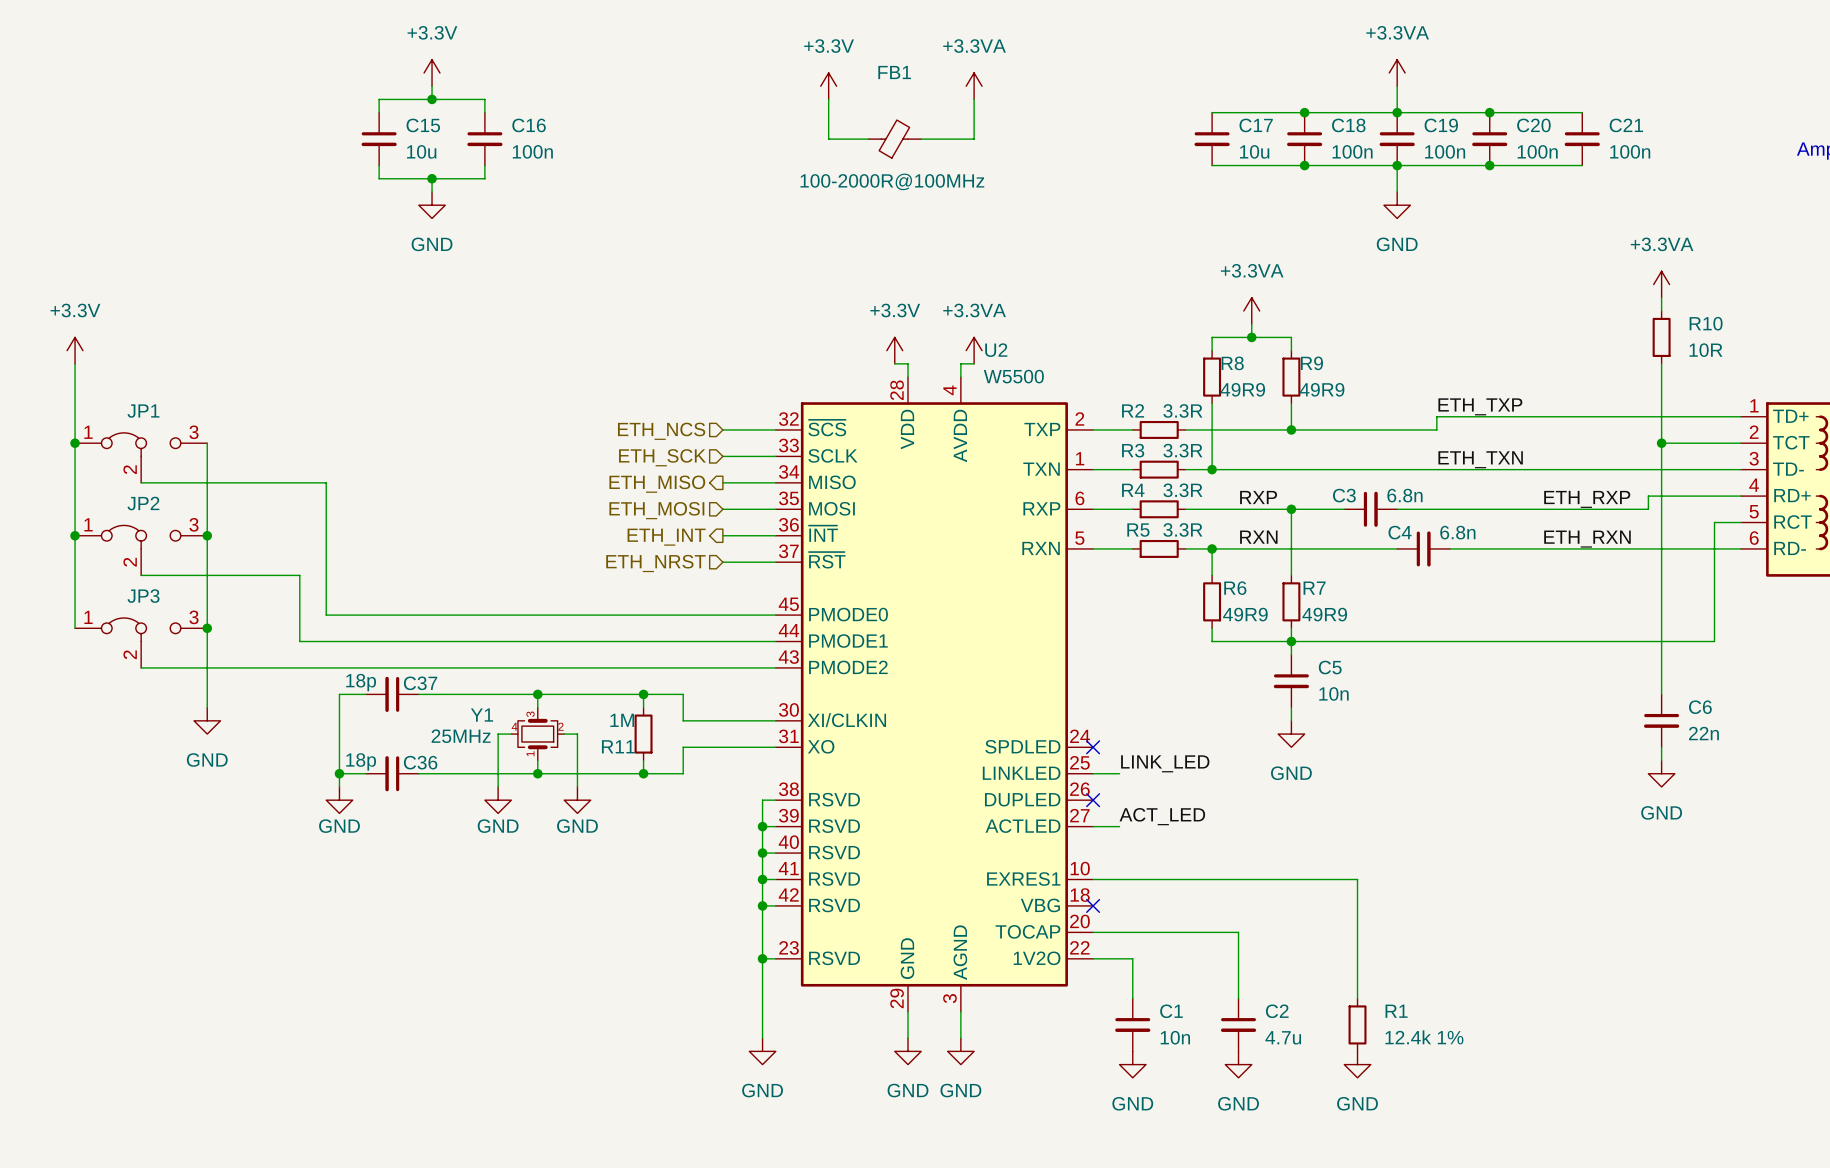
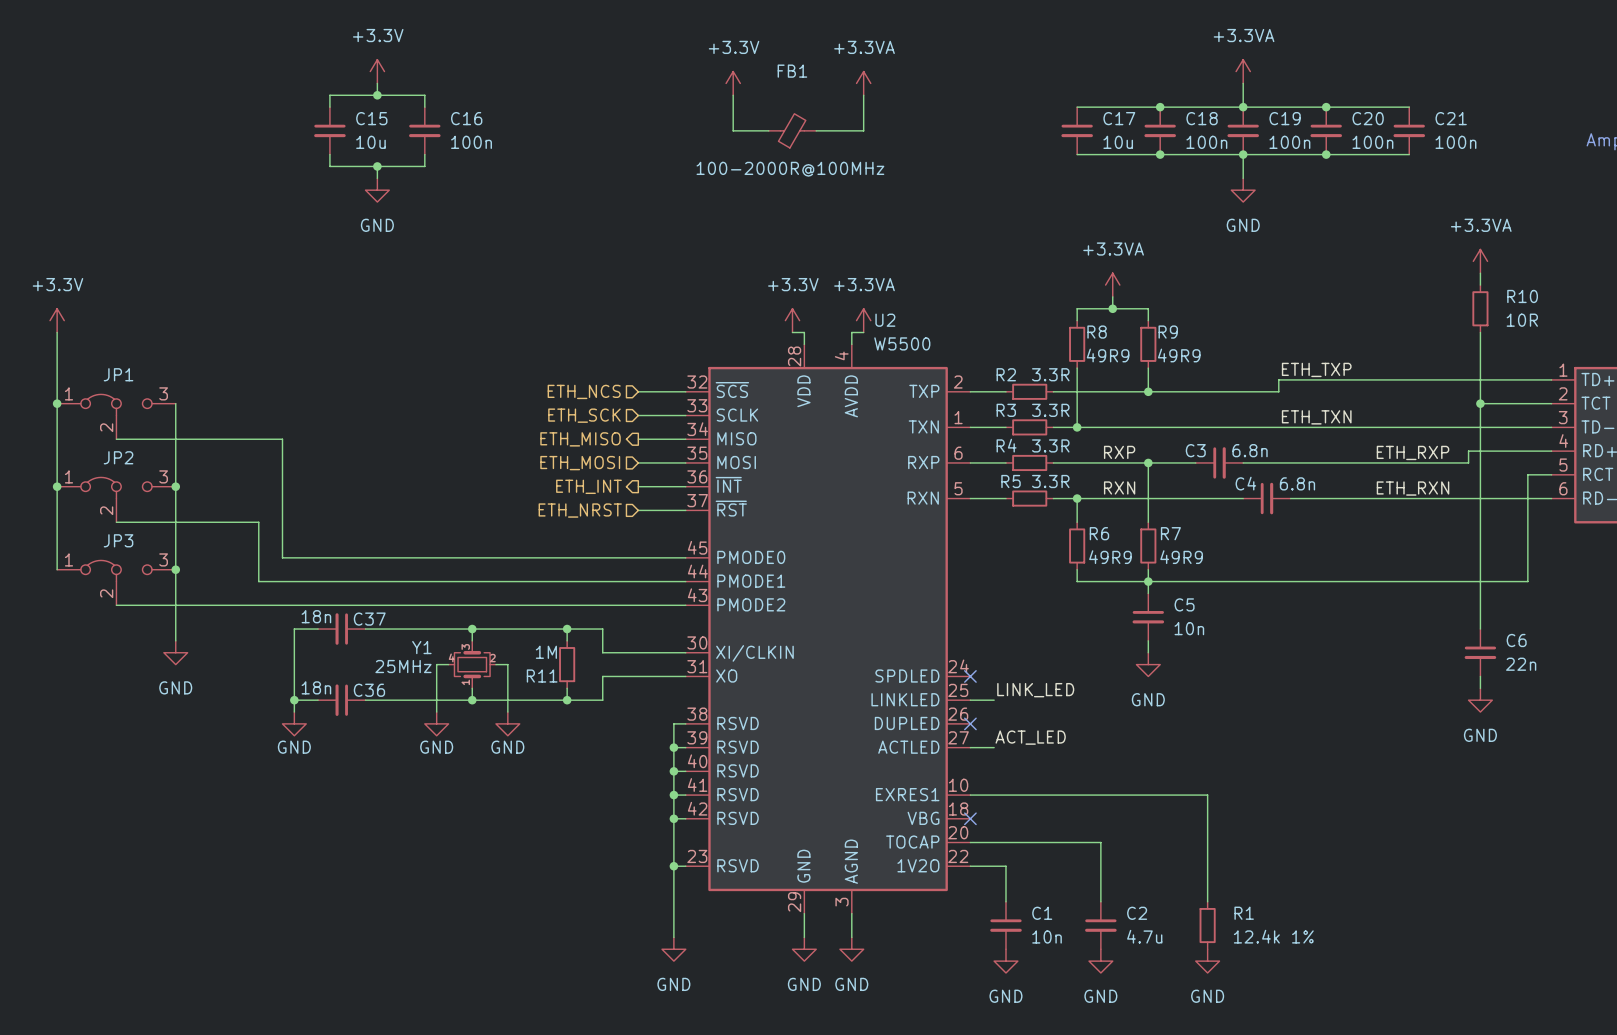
C37 value: 18p (361, 682) -> 18n (316, 616)
C36 value: 18p (361, 761) -> 18n (316, 687)

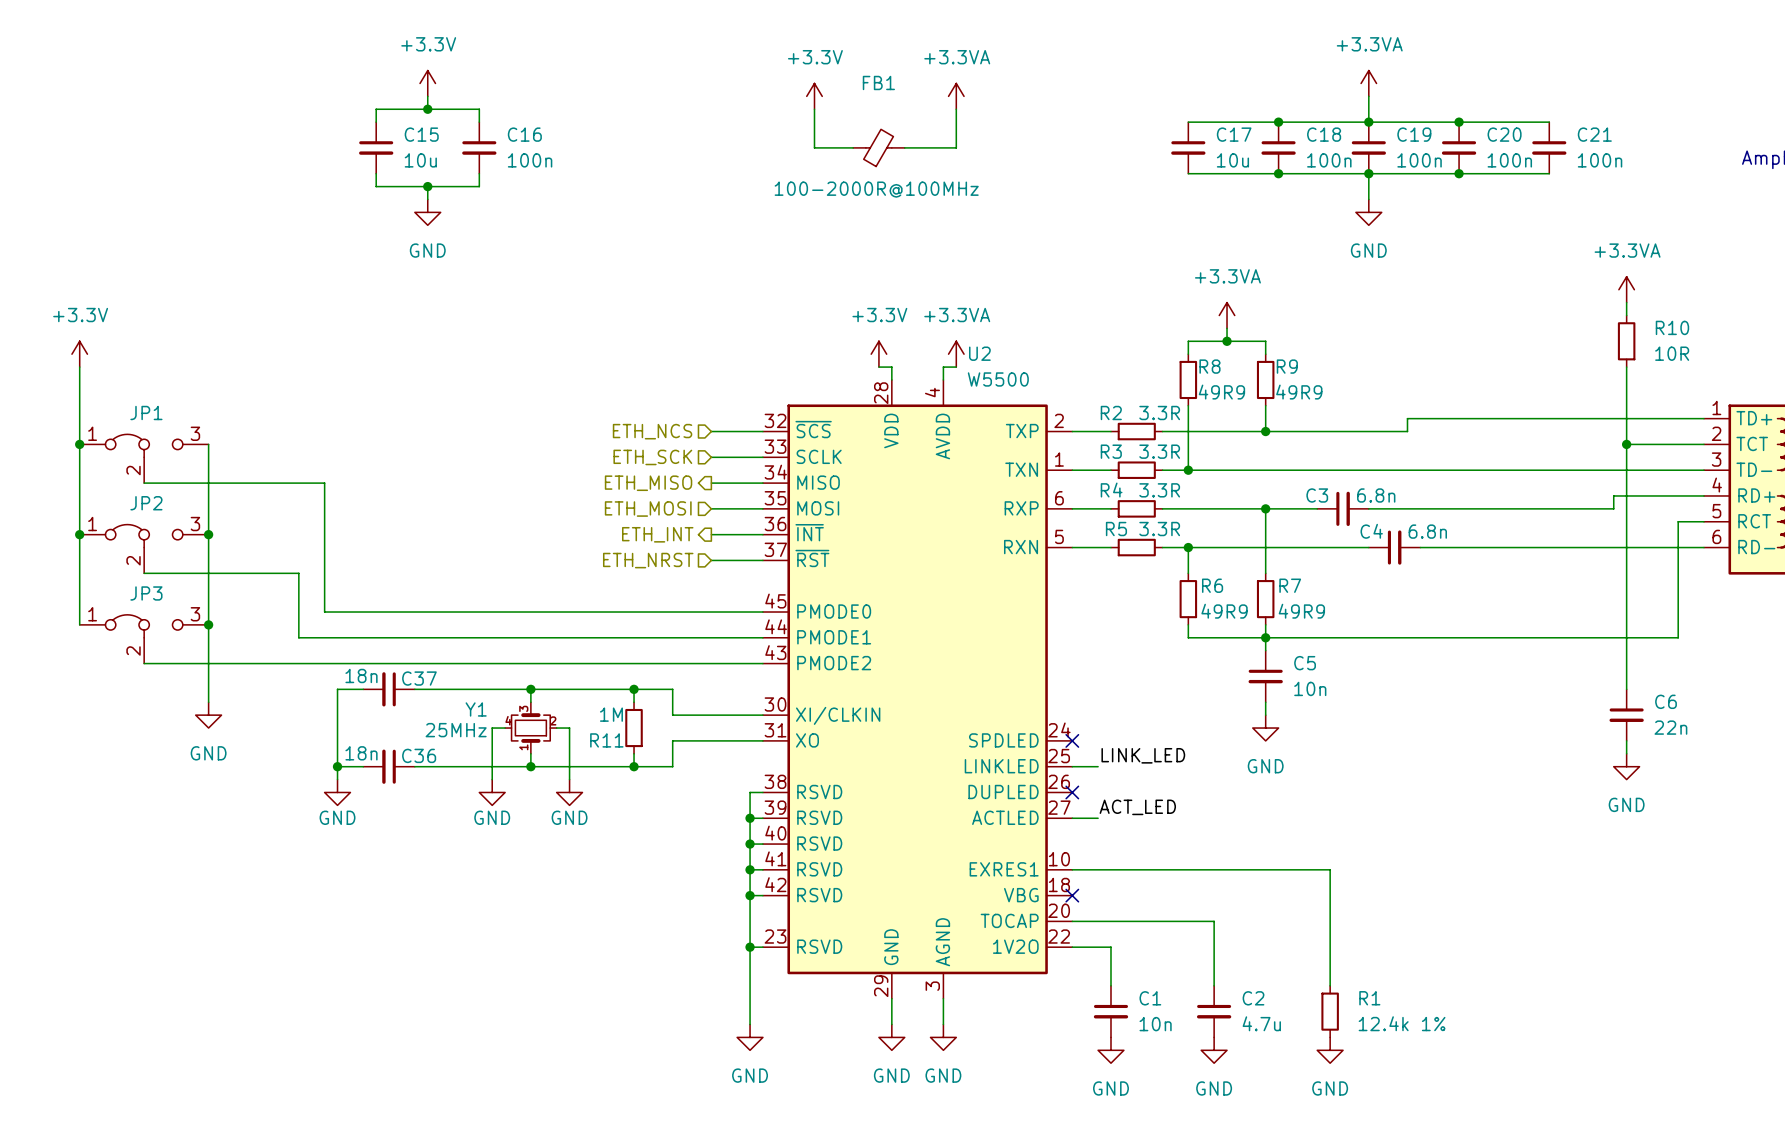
label: ETH_TXP (1316, 369) -> none
label: ETH_TXN (1316, 417) -> none
label: RXP (1119, 452) -> none
label: ETH_RXP (1413, 452) -> none
label: RXN (1119, 487) -> none
label: ETH_RXN (1413, 488) -> none

